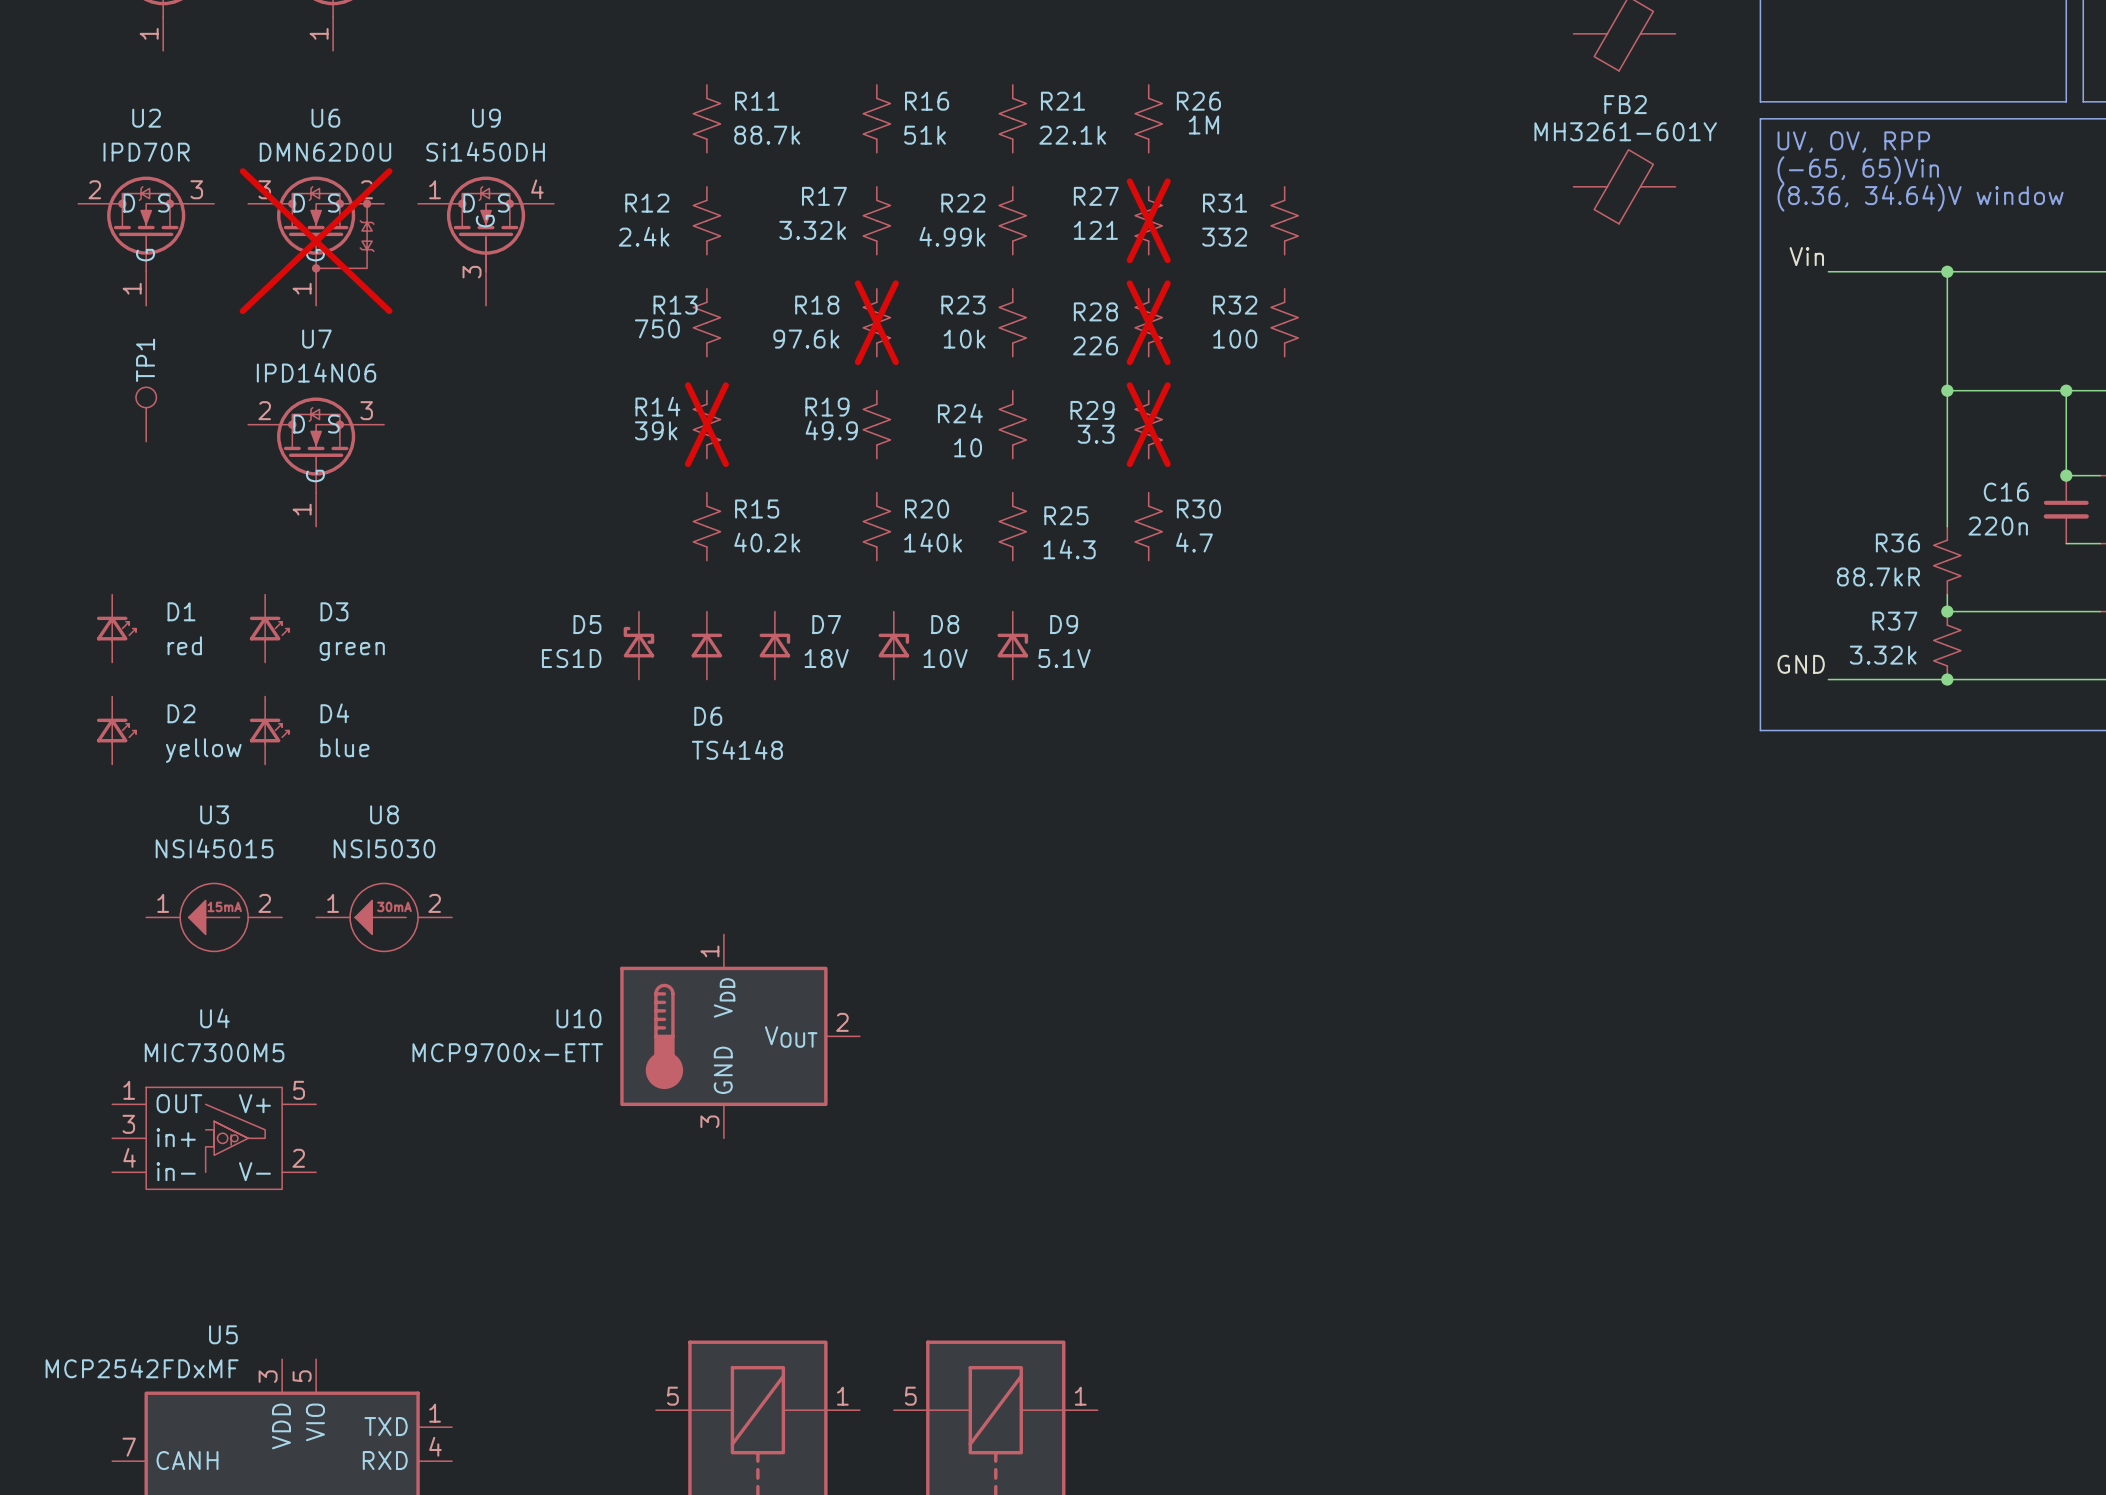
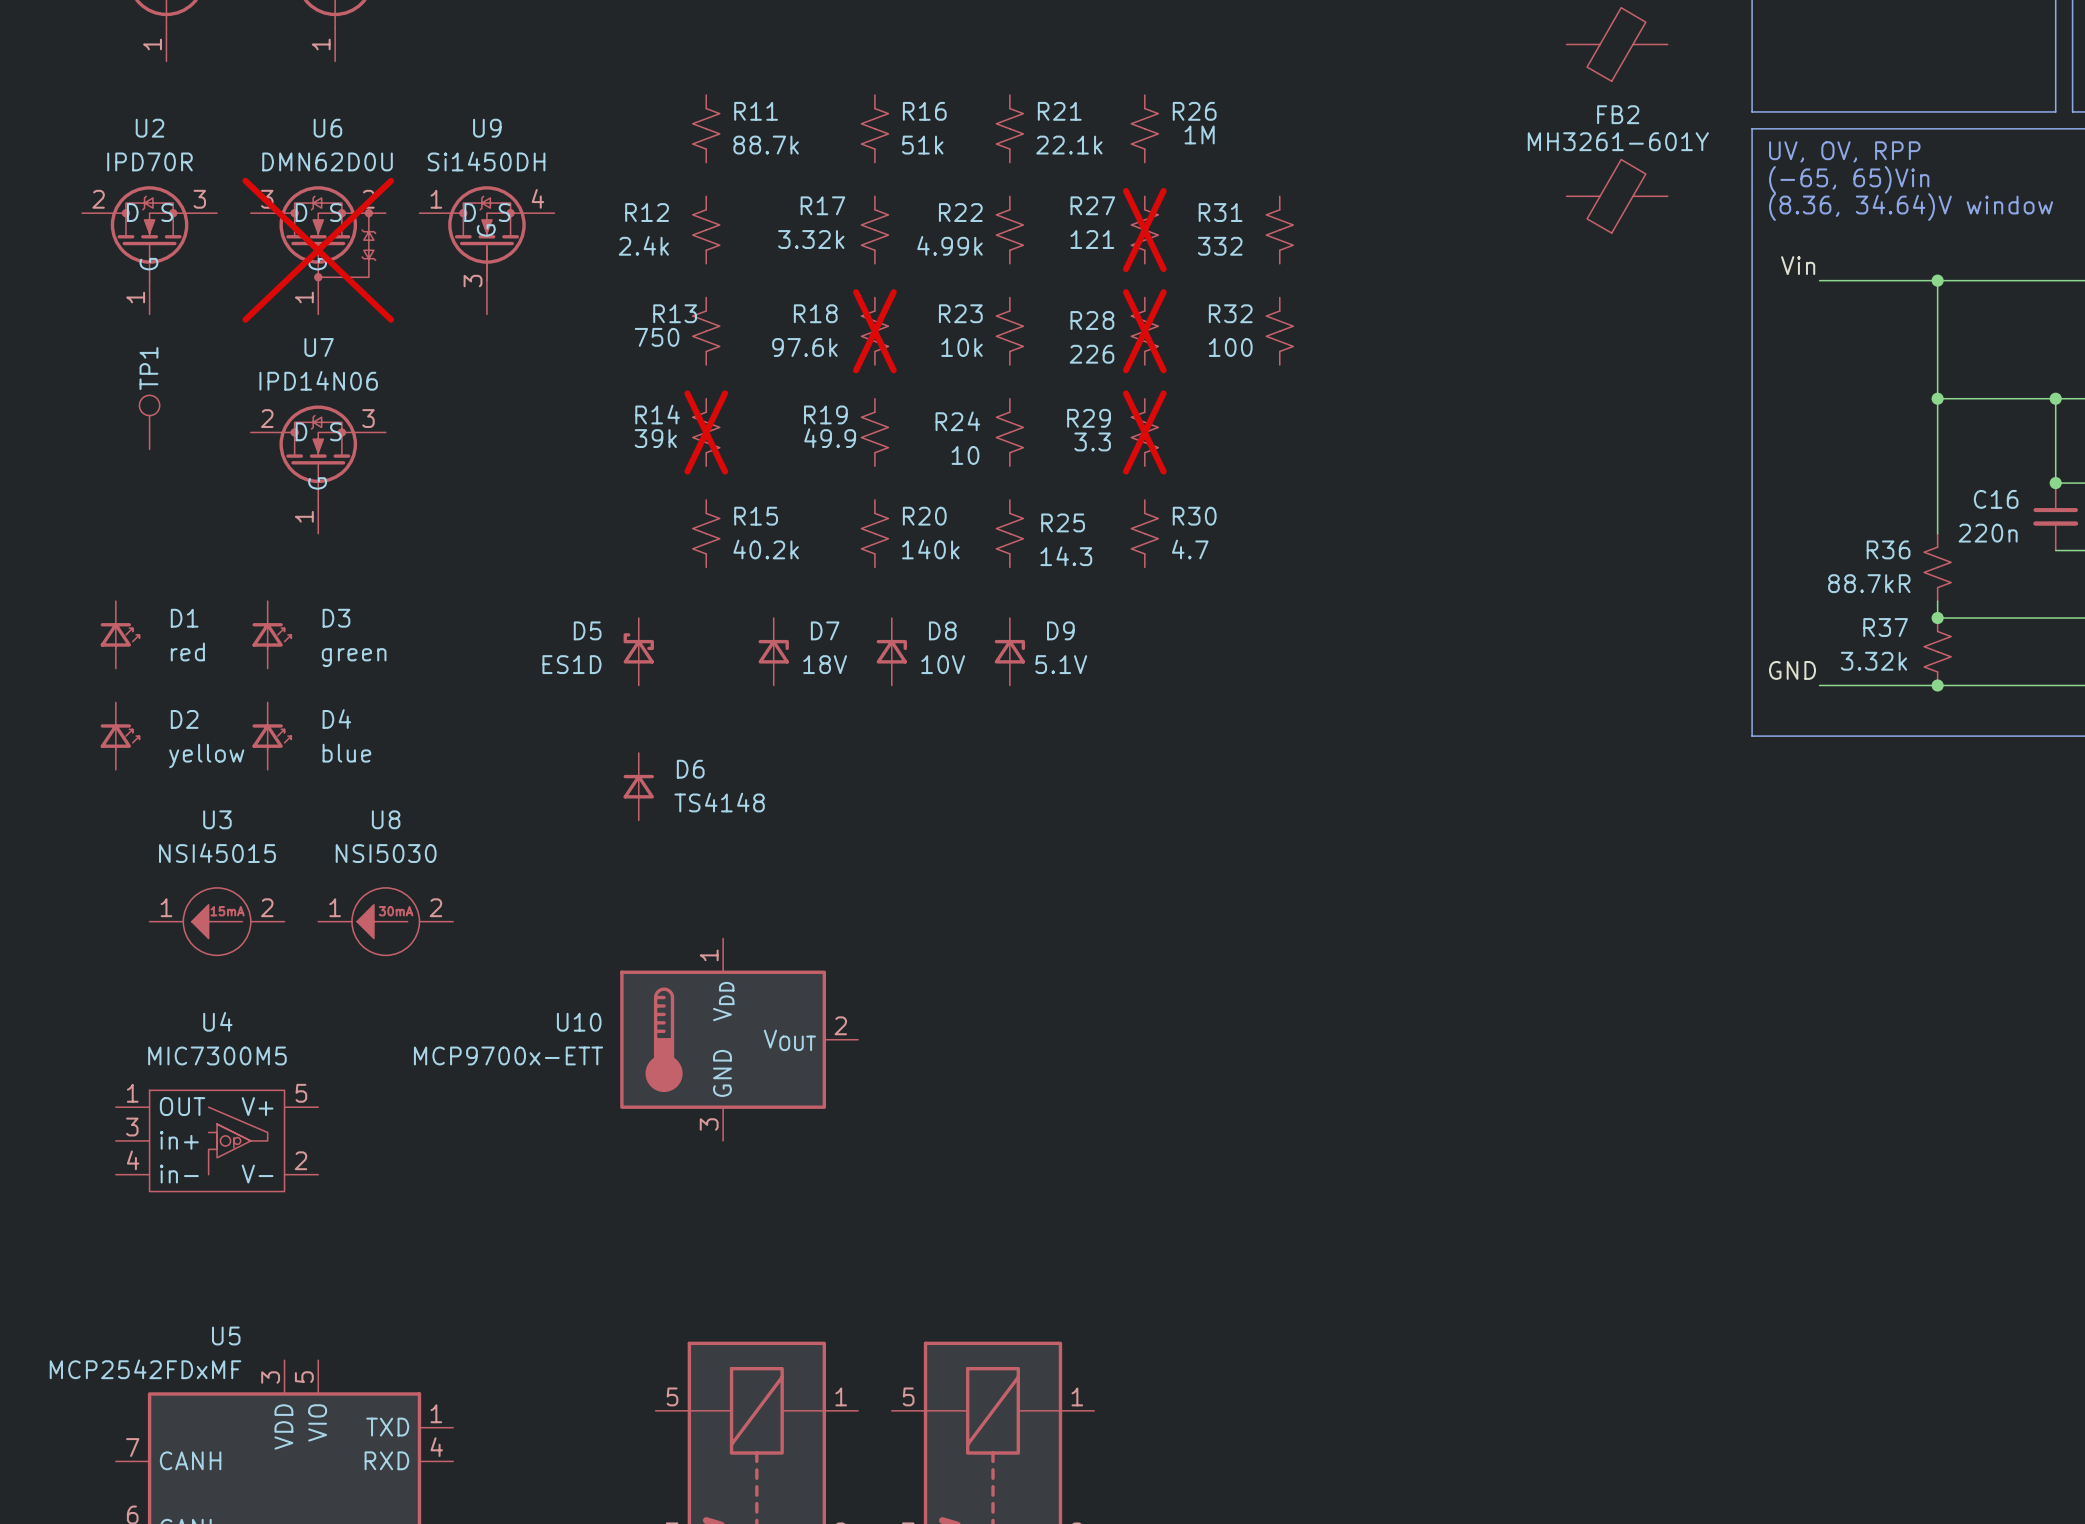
D6 position: (706, 645) -> (638, 786)
D6 name position: D6 (708, 716) -> D6 (690, 769)
D6 value position: TS4148 (737, 749) -> TS4148 (719, 802)

